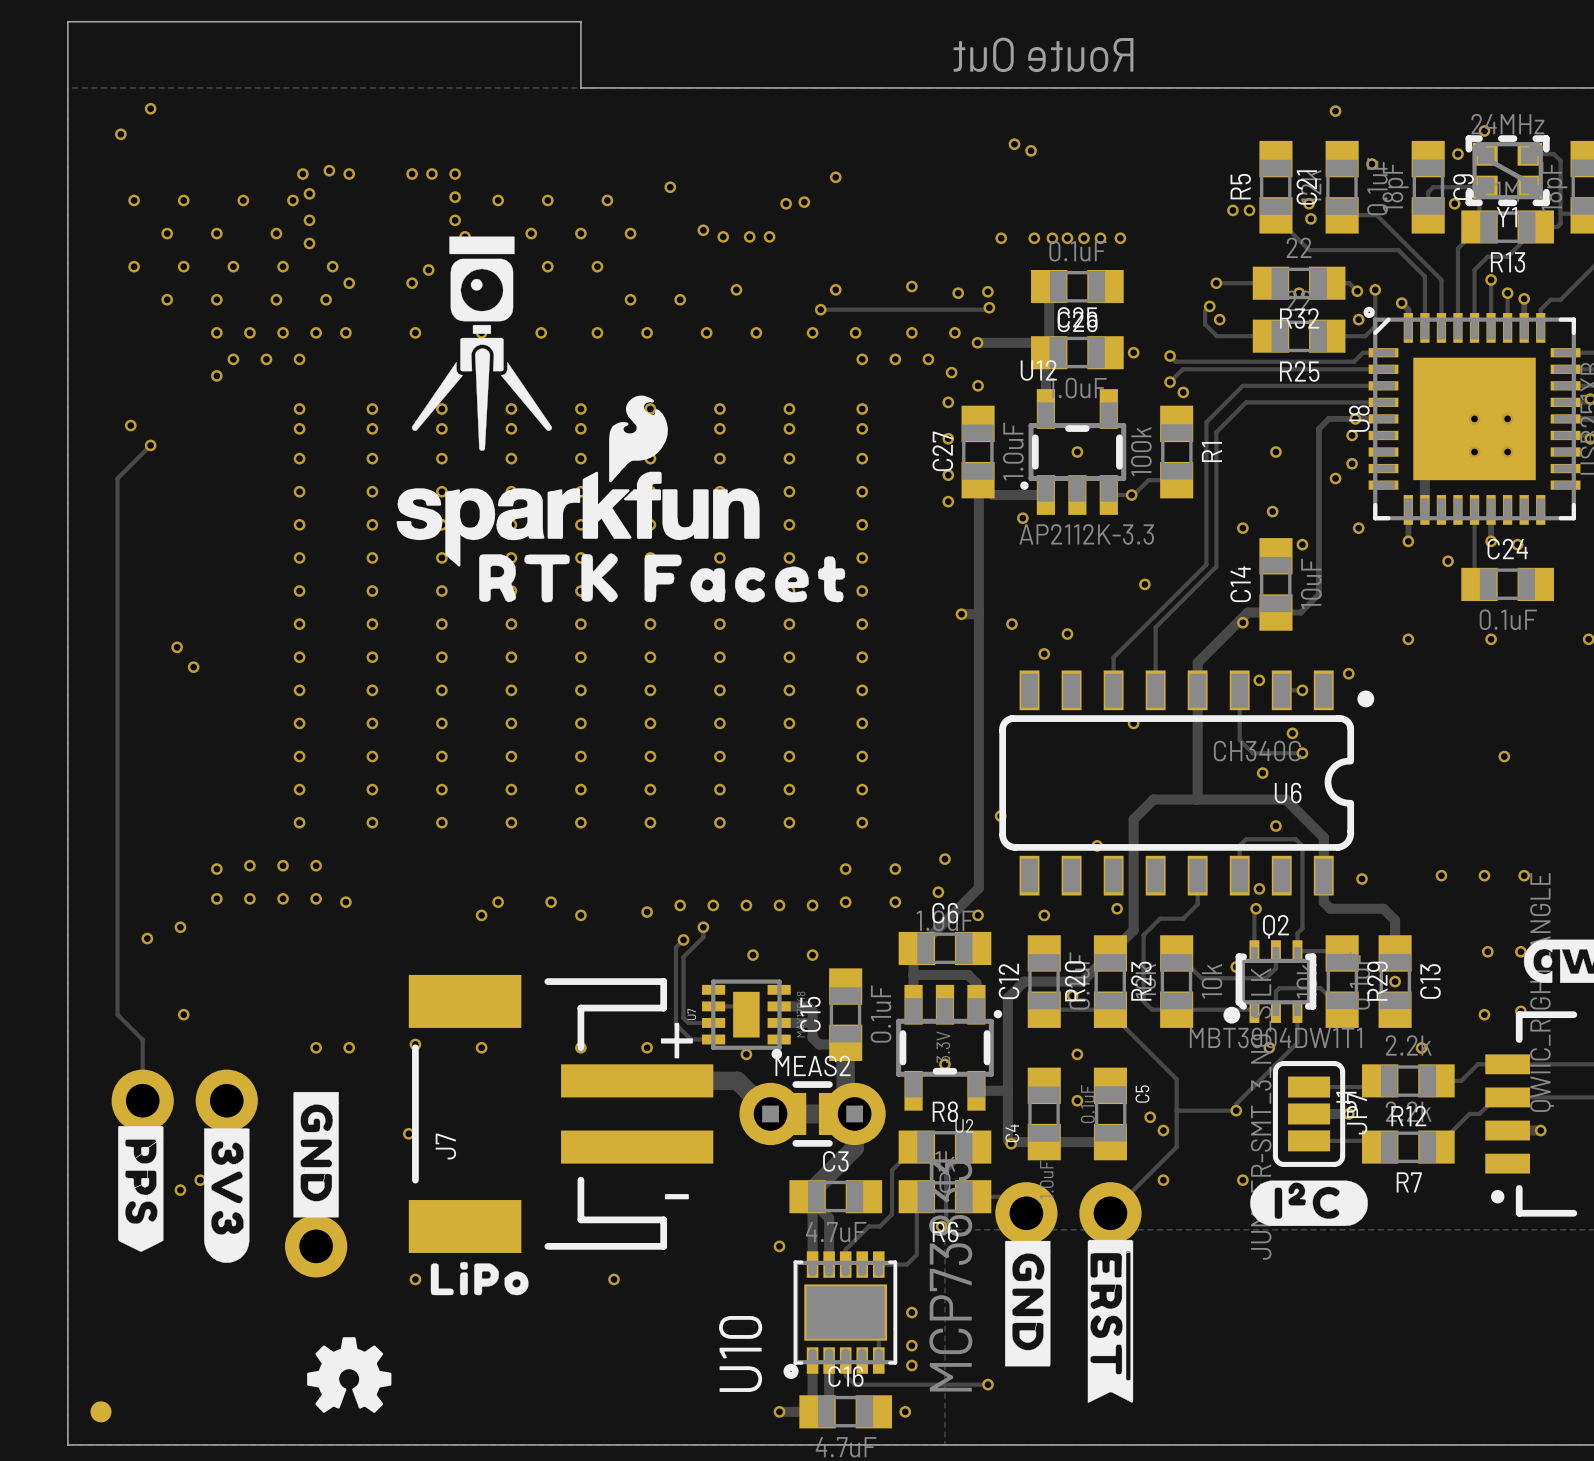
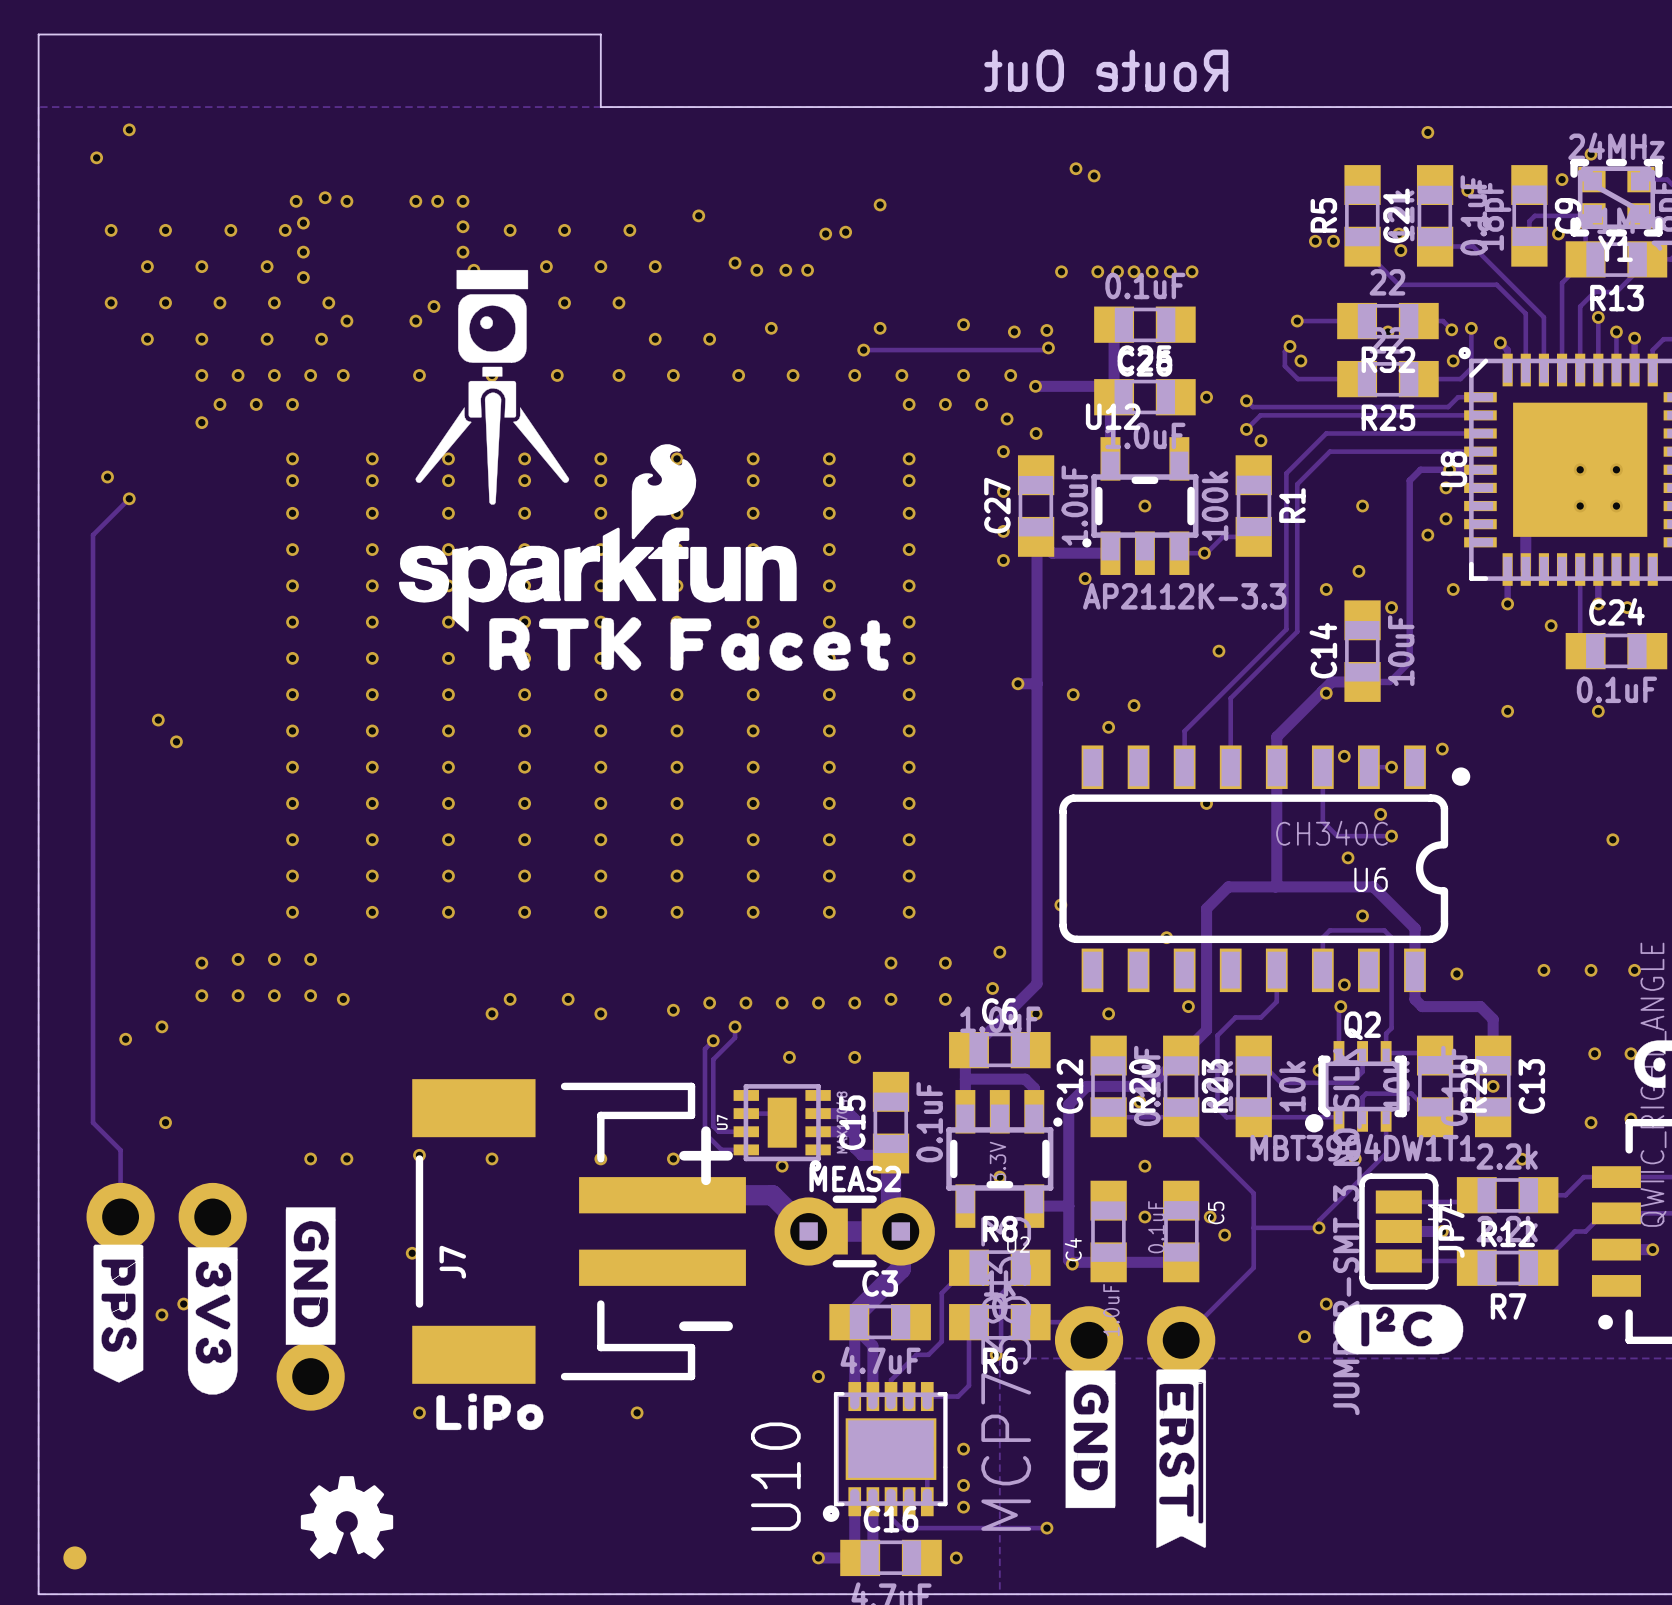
via position: (1163, 1130) -> (1210, 1216)
via: (1163, 1180) -> none
via: none -> (1304, 1336)

